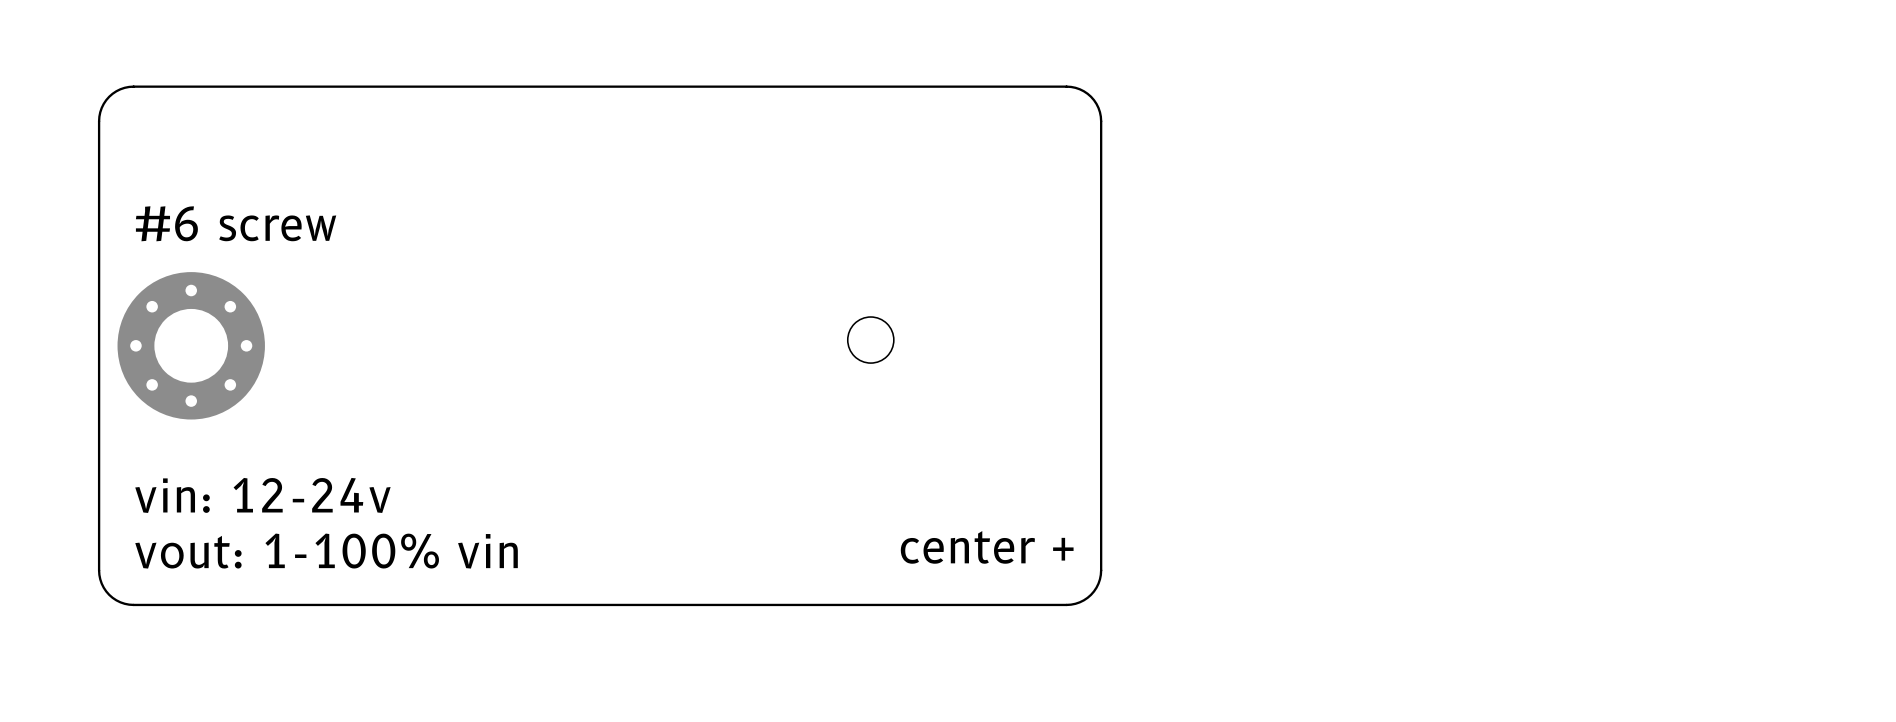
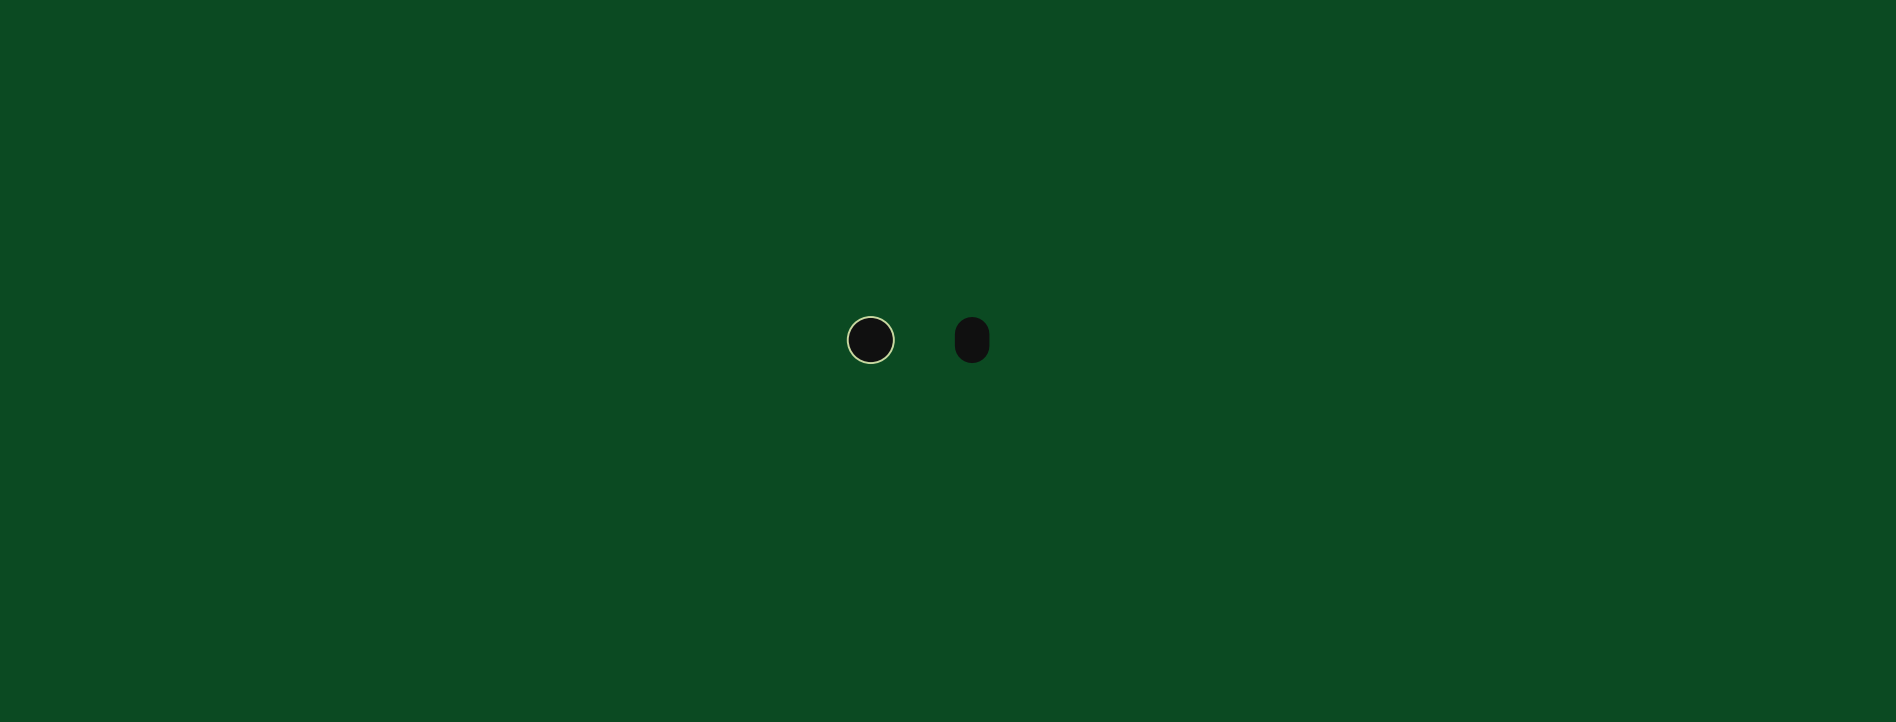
board edge: (1066, 86) (133, 86) (116, 91) (103, 103) (99, 121) (99, 570) (103, 587) (116, 600) (133, 604) (1066, 604) (1083, 600) (1096, 587) (1101, 570) (1101, 121) (1098, 107) (1091, 96) (1079, 89) (1066, 86) -> none
text: #6 screw (236, 223) -> none
part: (191, 345) -> none
text: vin: 12-24v (262, 495) -> none
text: center + (987, 547) -> none
text: vout: 1-100% vin (326, 551) -> none

